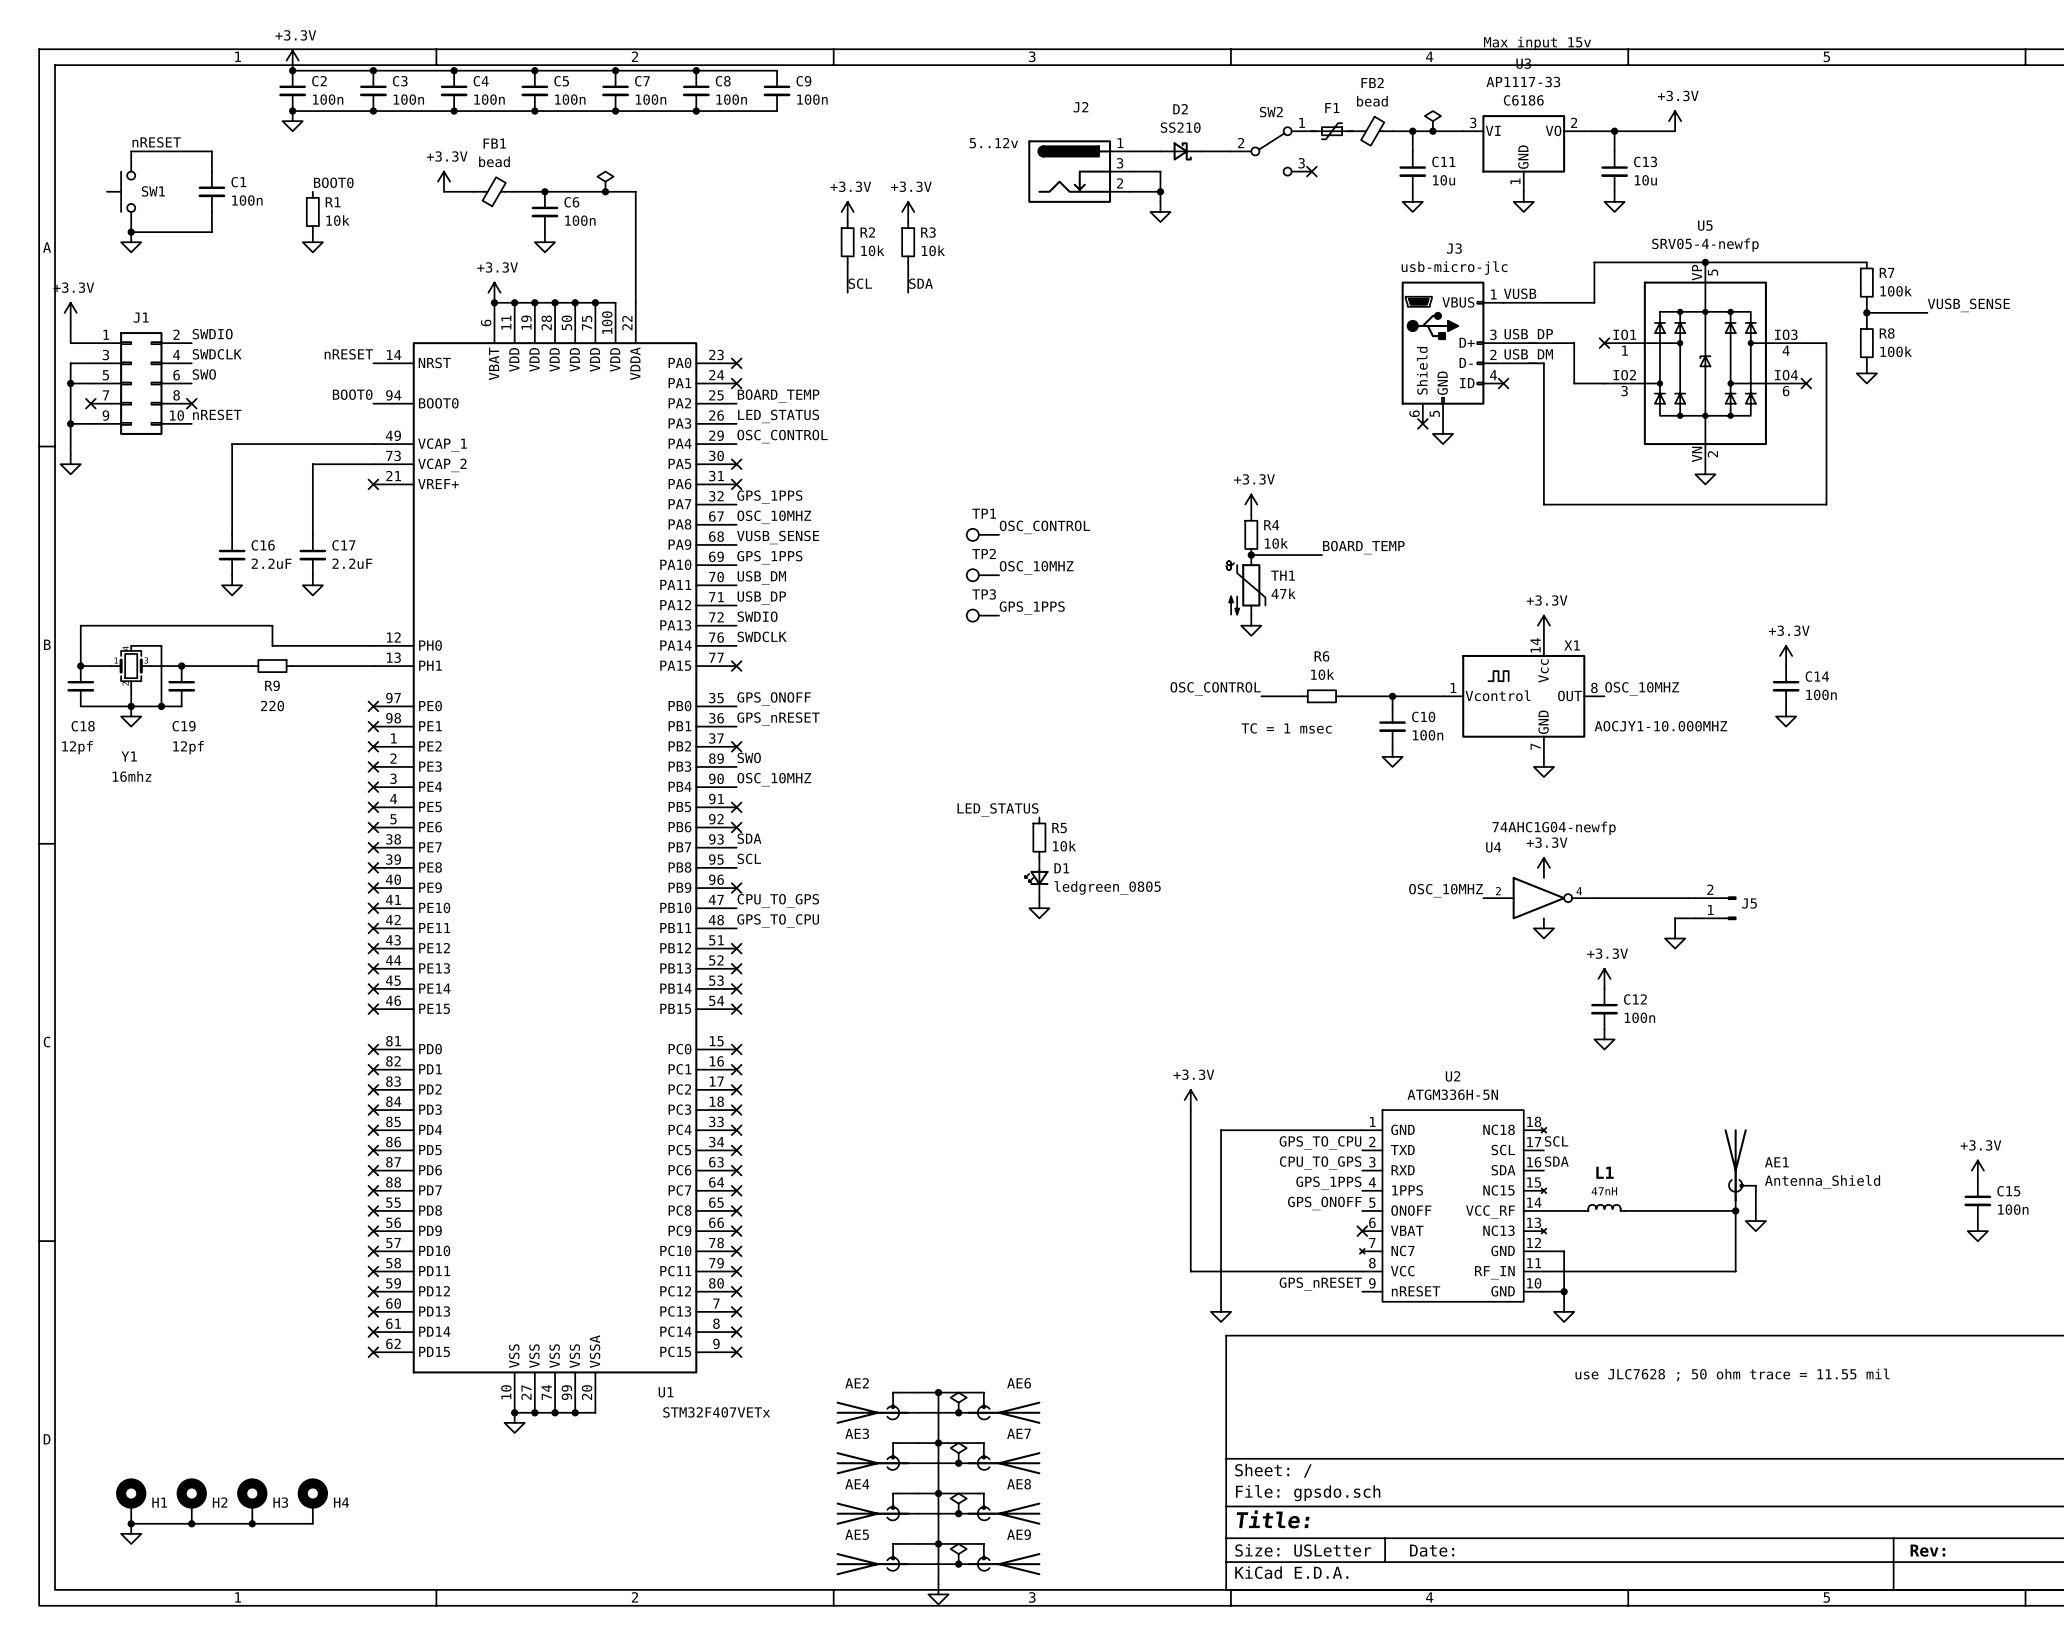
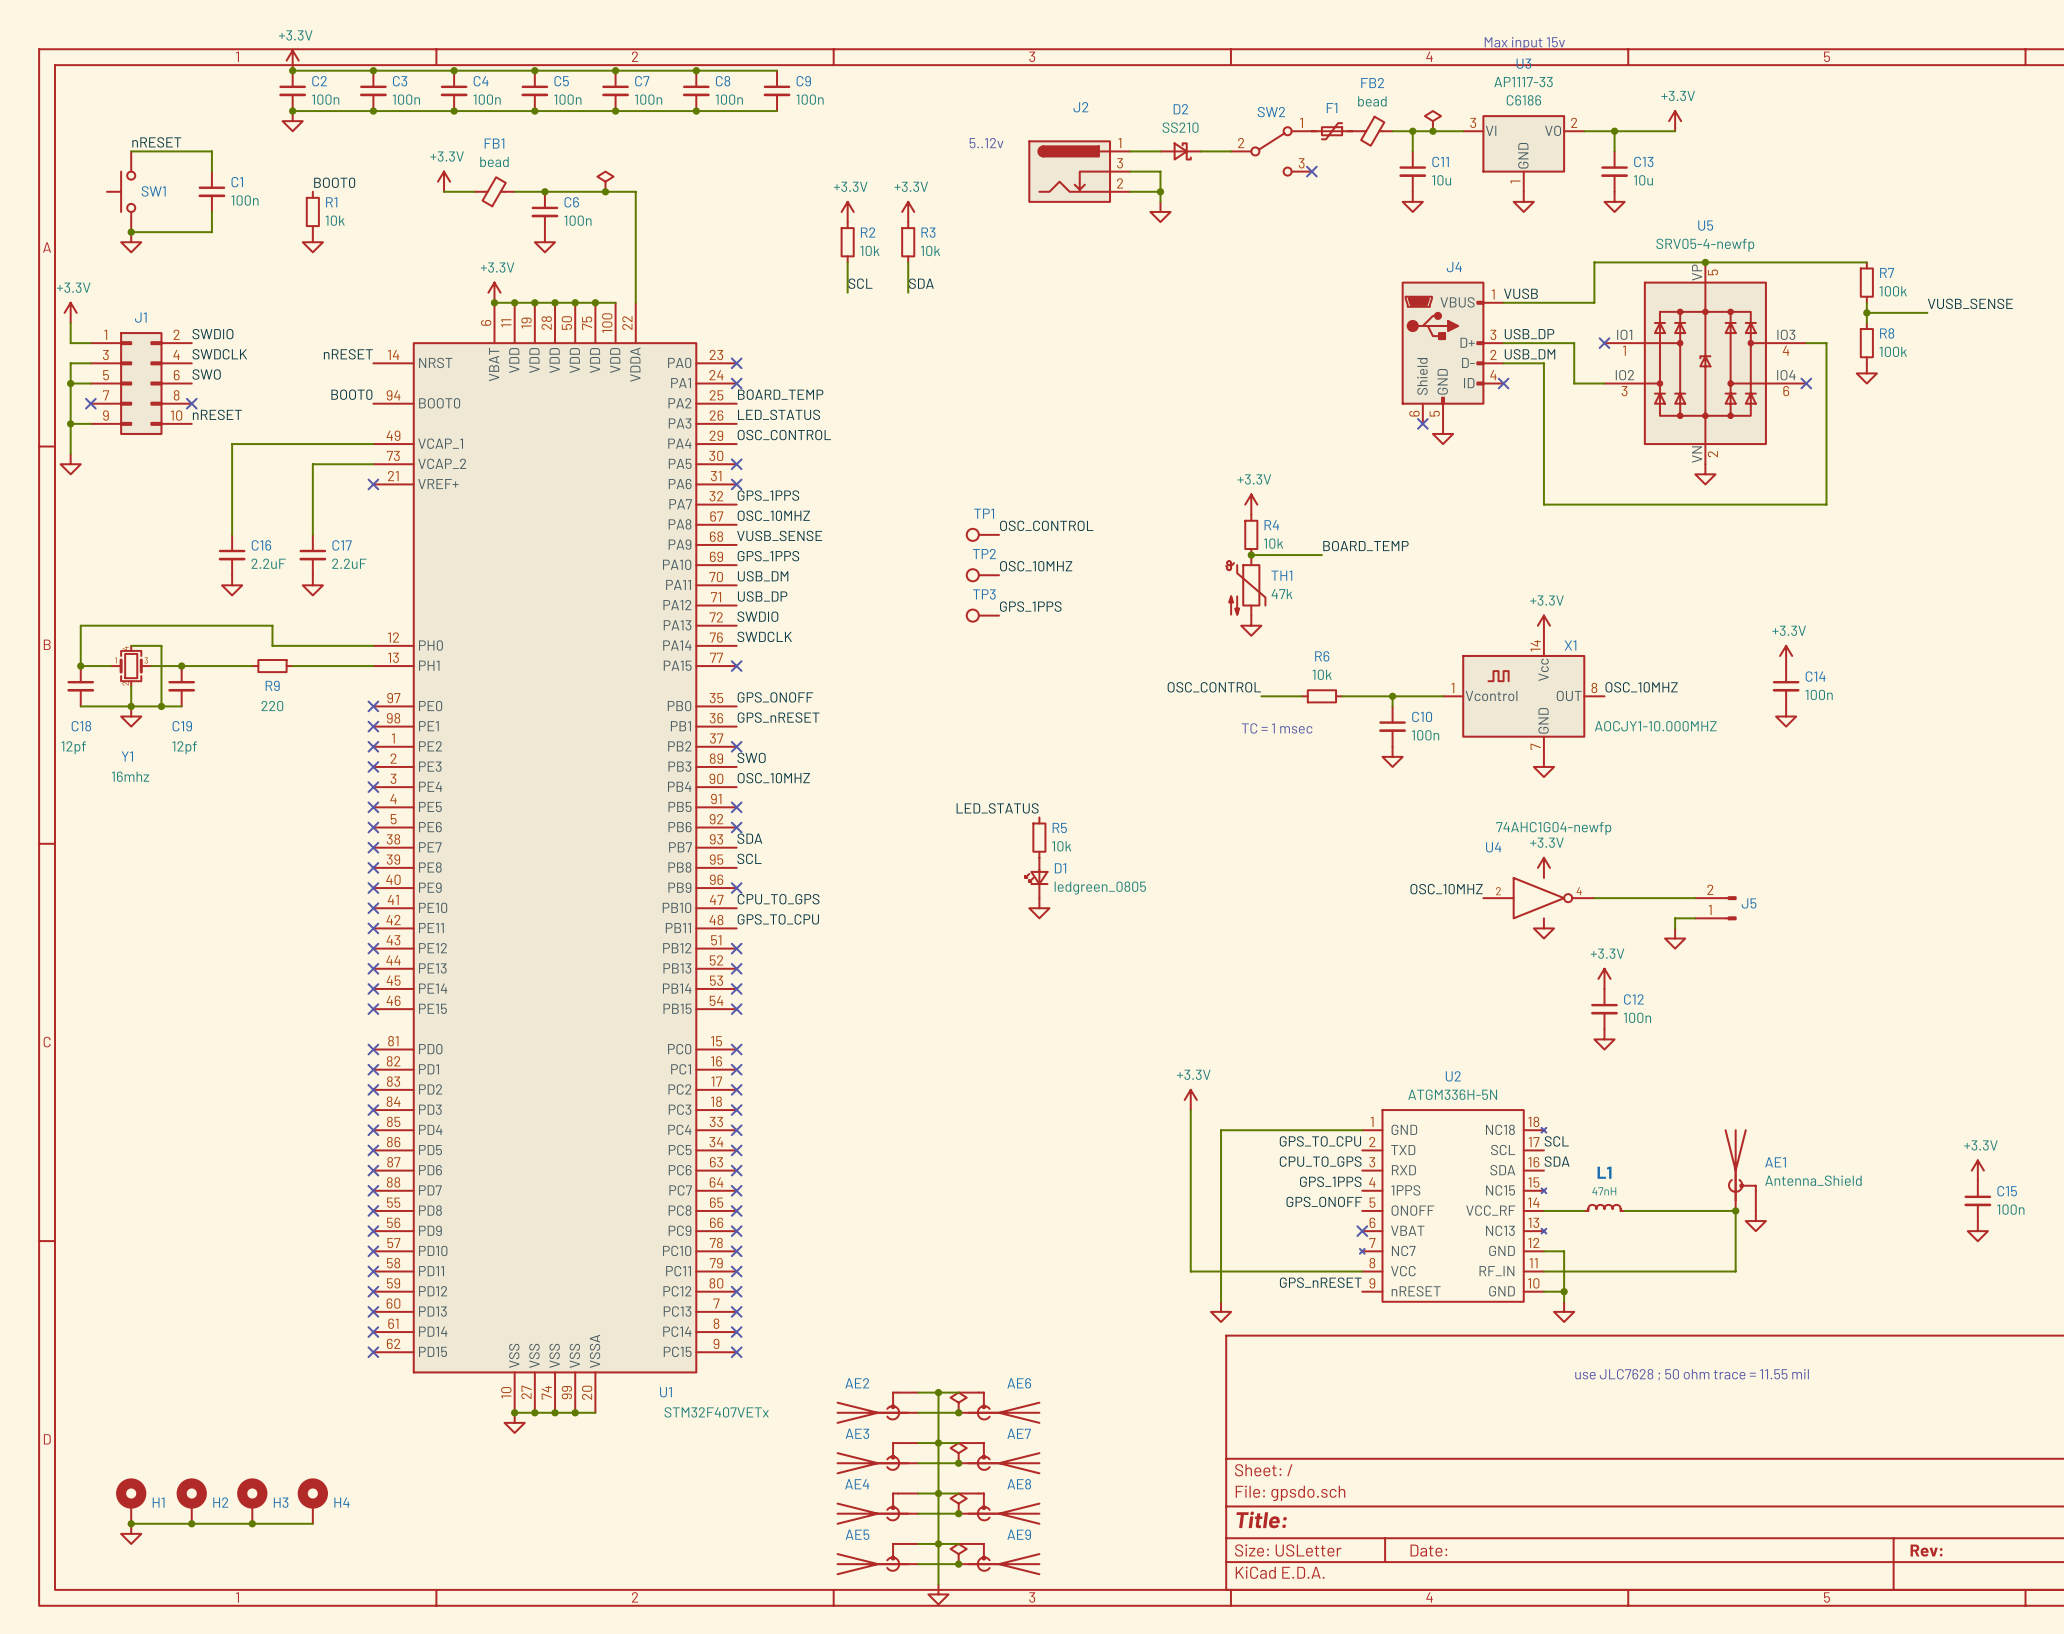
J3 name: J3 (1454, 248) -> J4 (1454, 267)
J3 value: usb-micro-jlc (1454, 268) -> none

